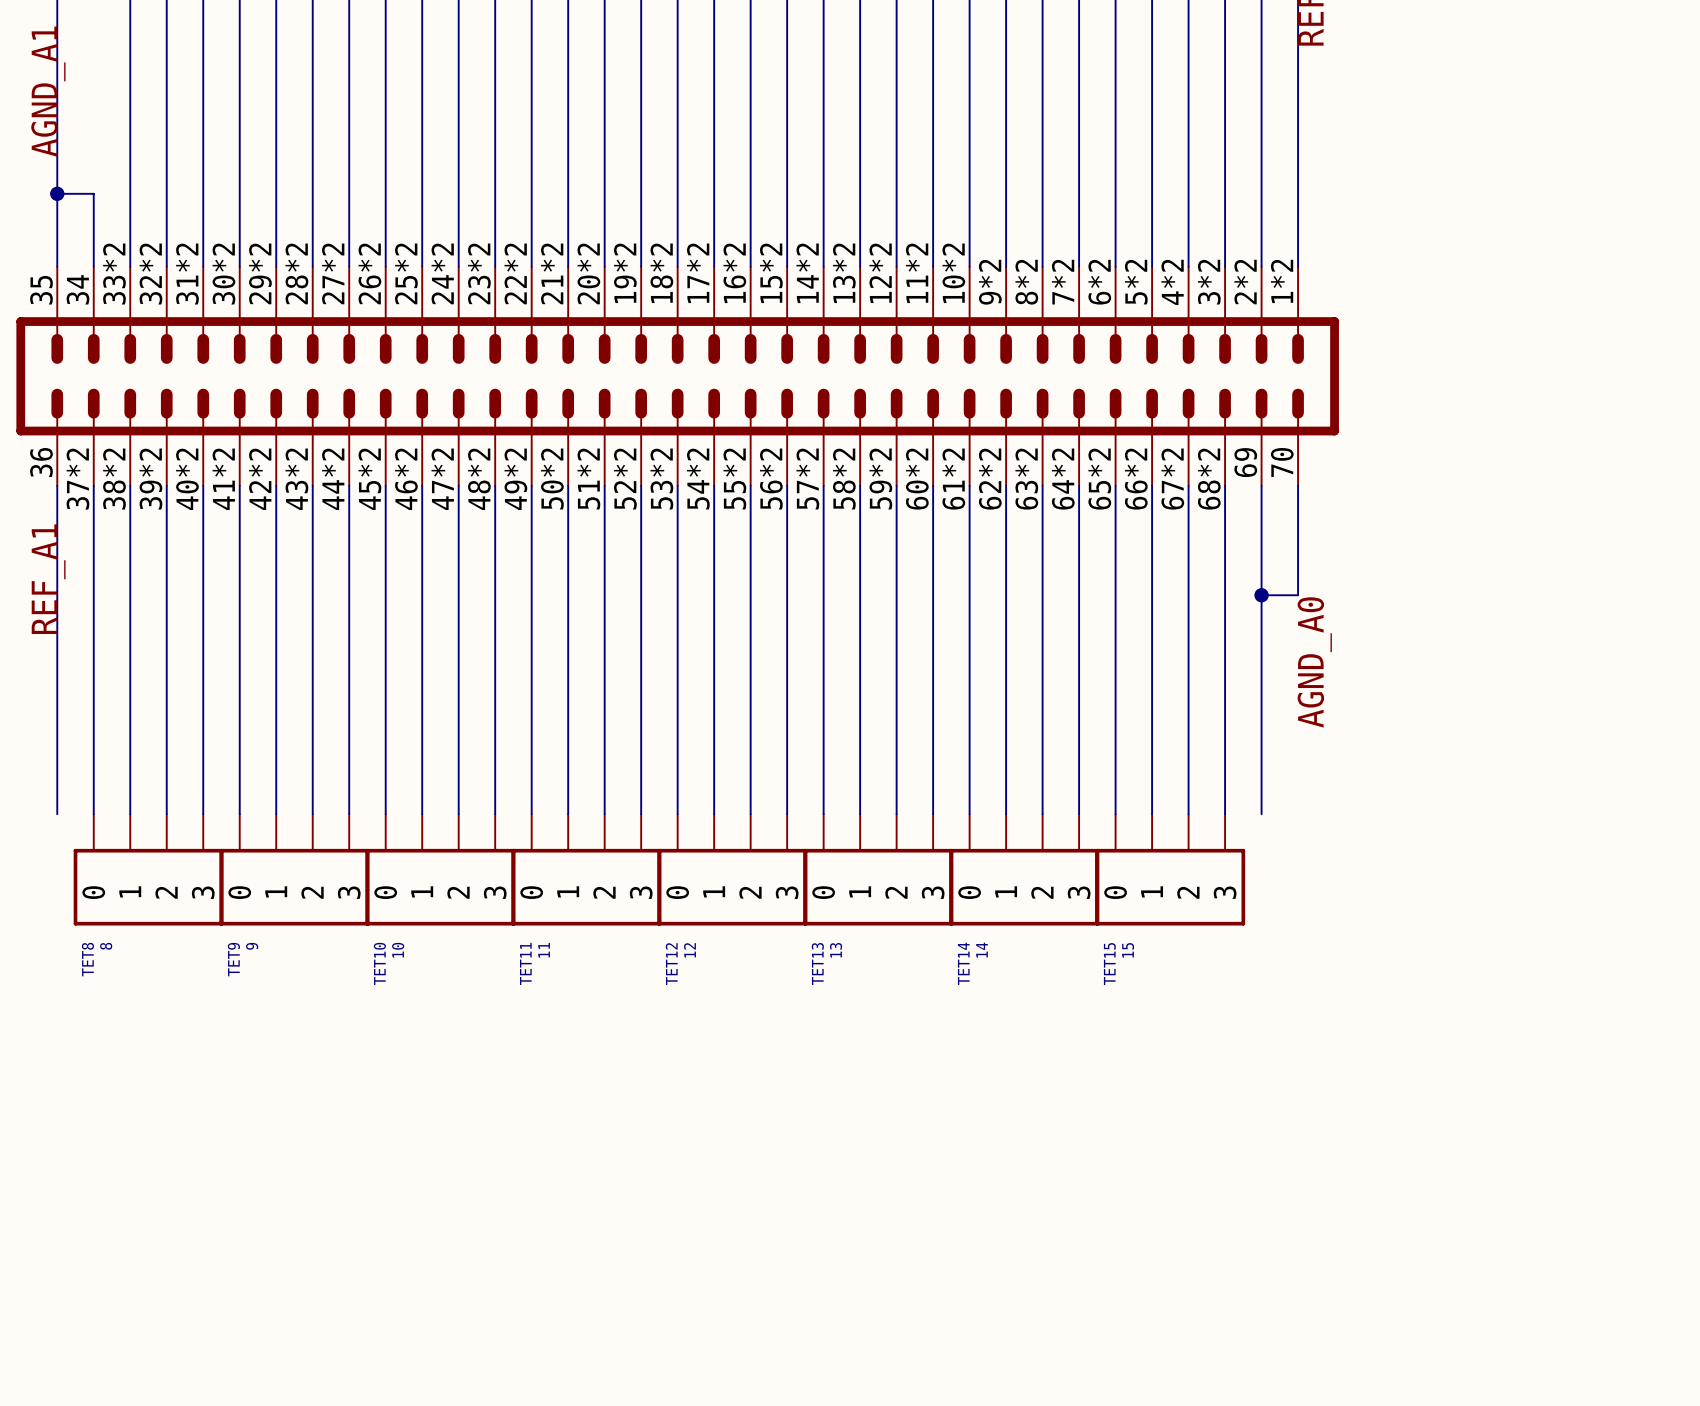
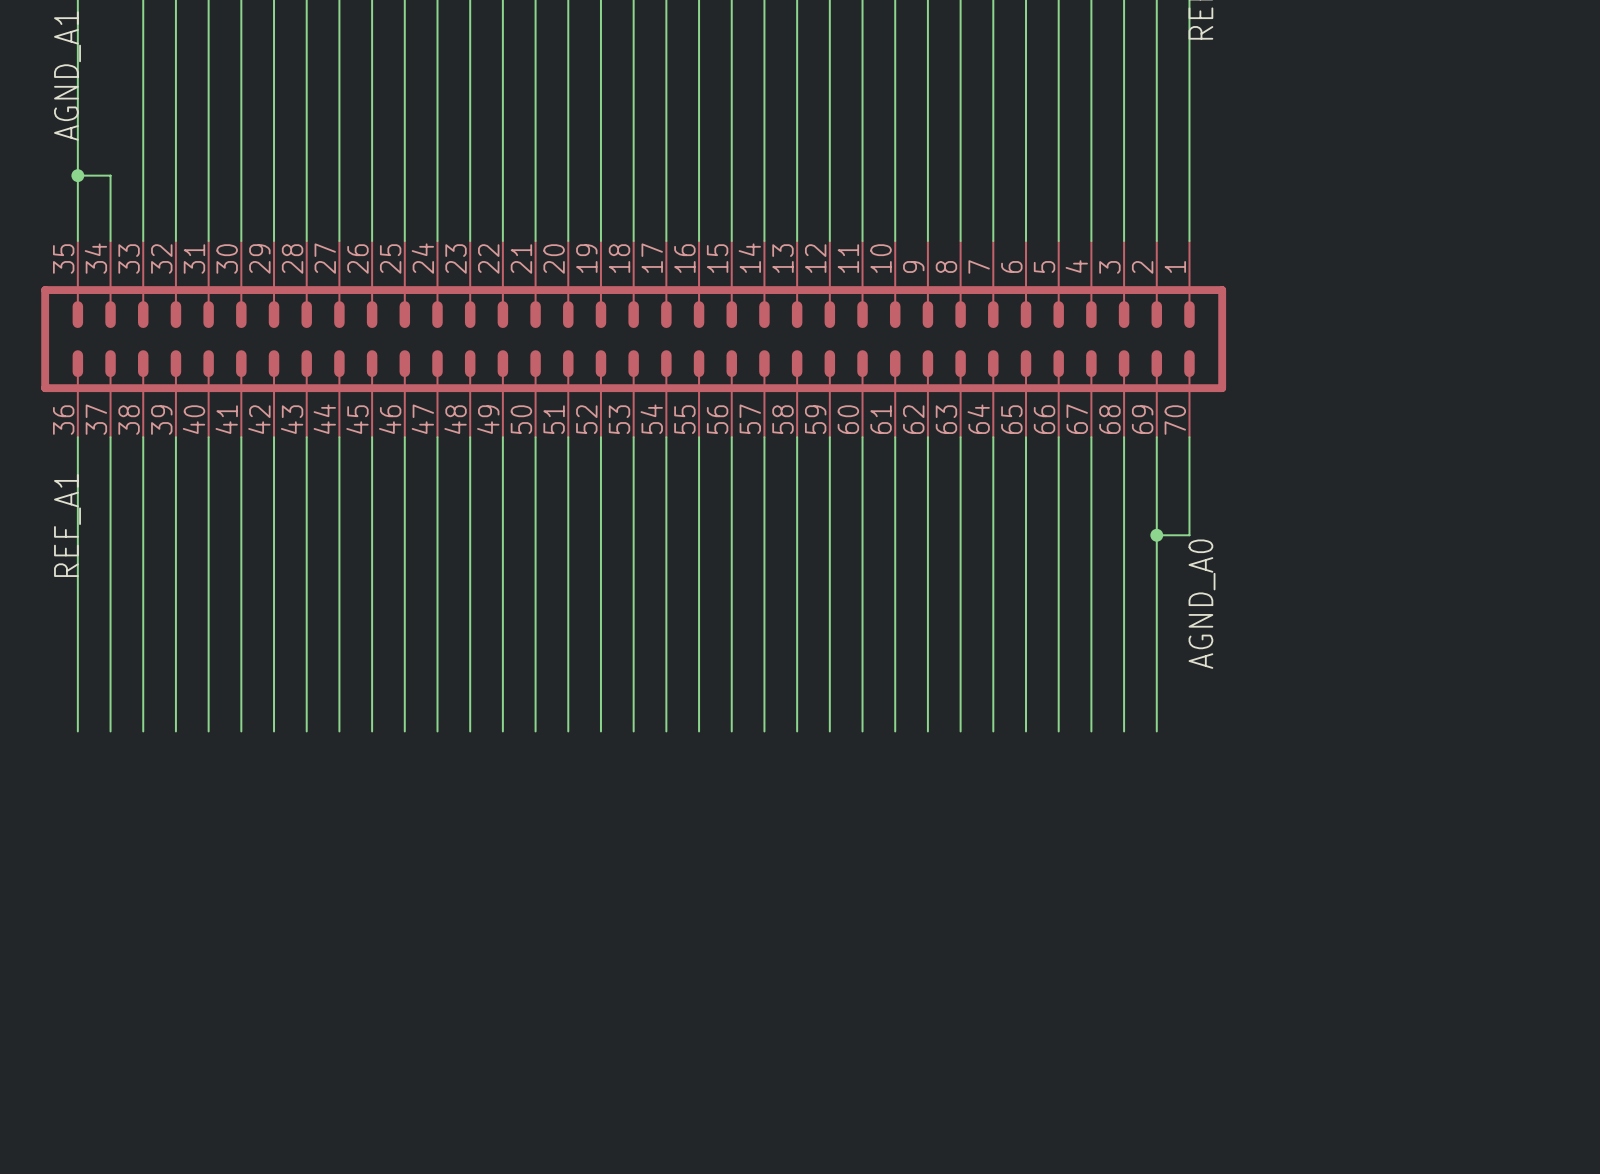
part symbol: [16, 266, 1339, 486] -> [41, 241, 1227, 438]
TET8: 8 (148, 869) -> none
TET9: 9 (294, 869) -> none
TET10: 10 (440, 869) -> none
TET11: 11 (586, 869) -> none
TET12: 12 (732, 869) -> none
TET13: 13 (878, 869) -> none
TET14: 14 (1024, 869) -> none
TET15: 15 (1170, 869) -> none

